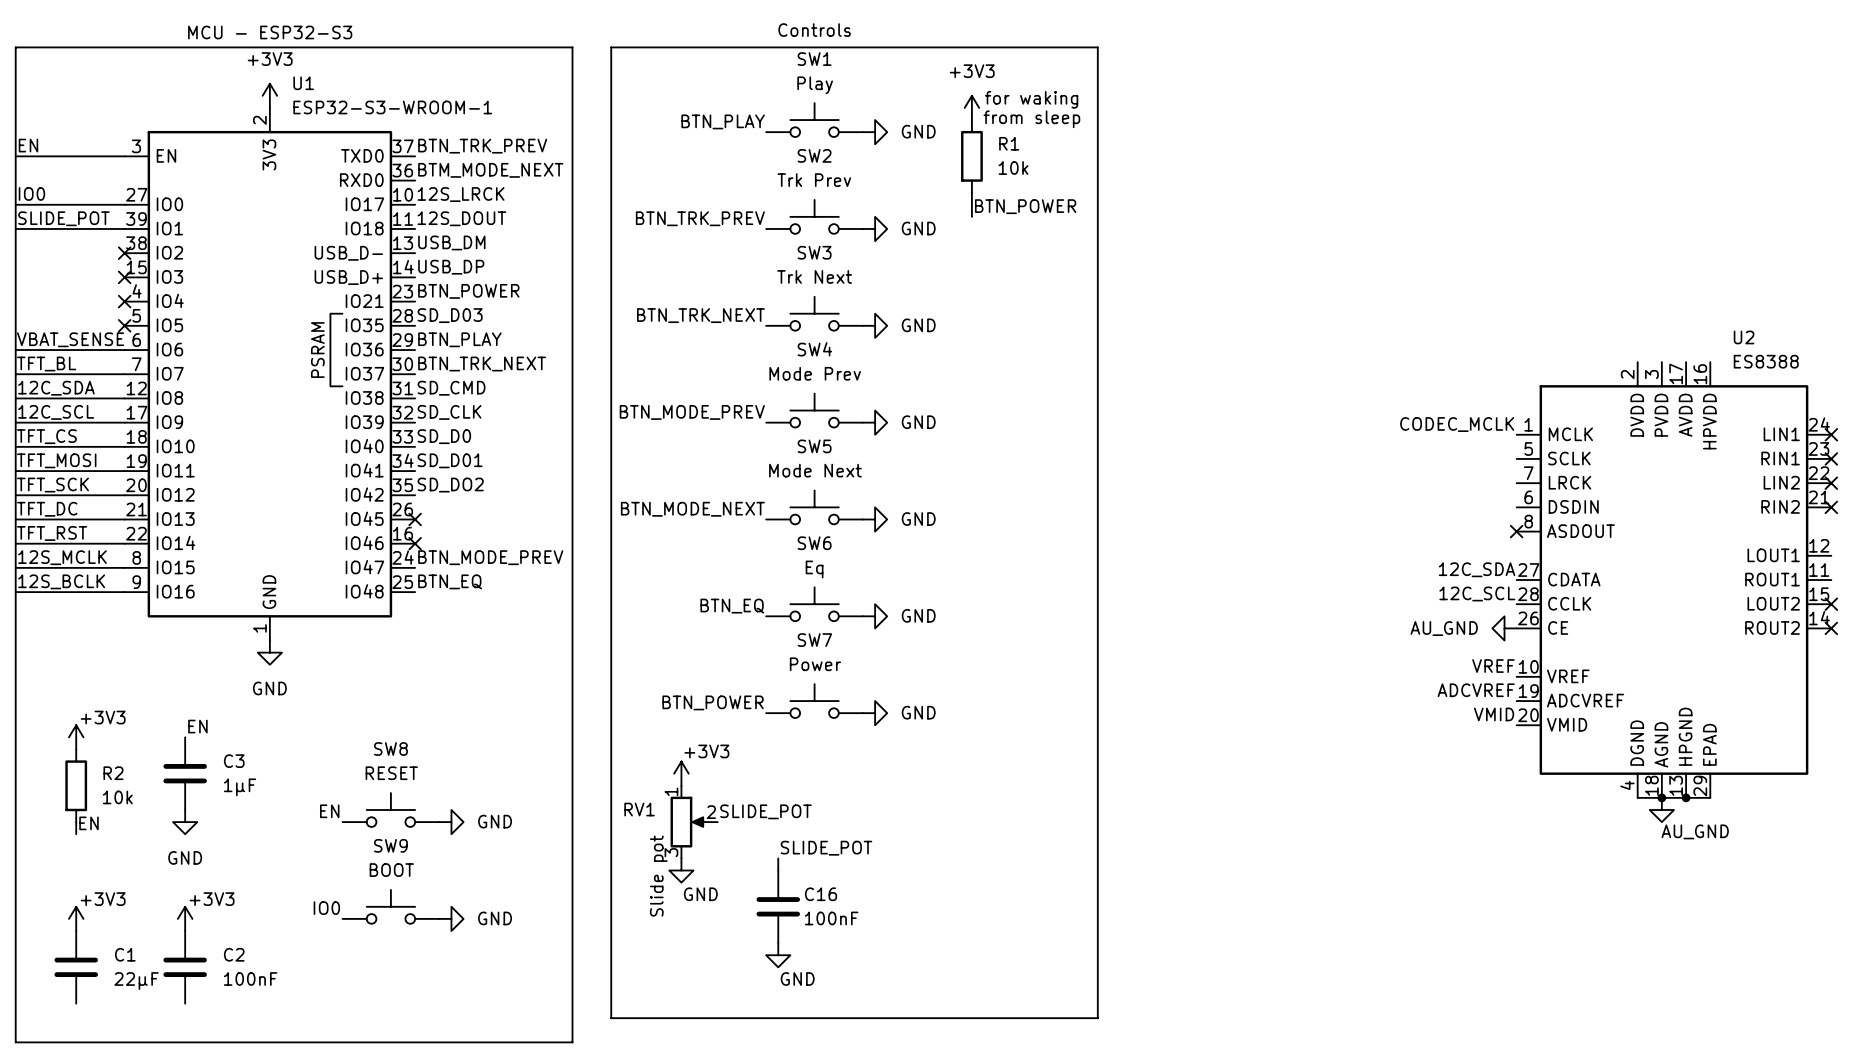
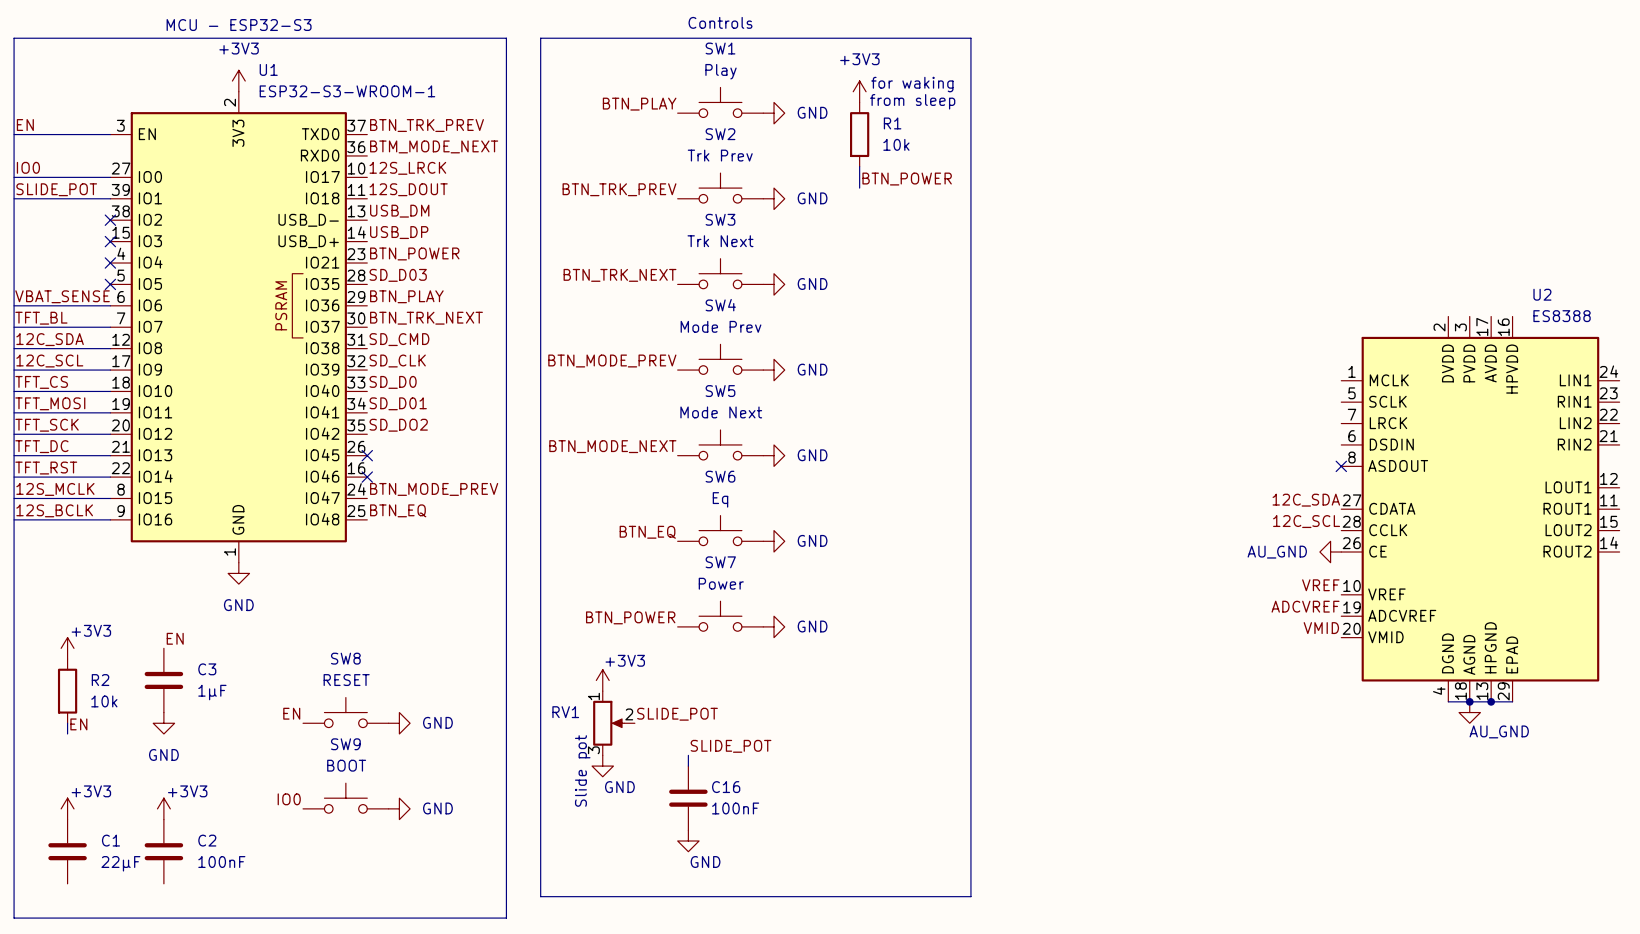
label: CODEC_MCLK (1457, 424) -> none
no-connect mark: (1831, 434) -> none
no-connect mark: (1831, 458) -> none
no-connect mark: (1831, 483) -> none
no-connect mark: (1831, 507) -> none
no-connect mark: (1831, 604) -> none
no-connect mark: (1831, 628) -> none

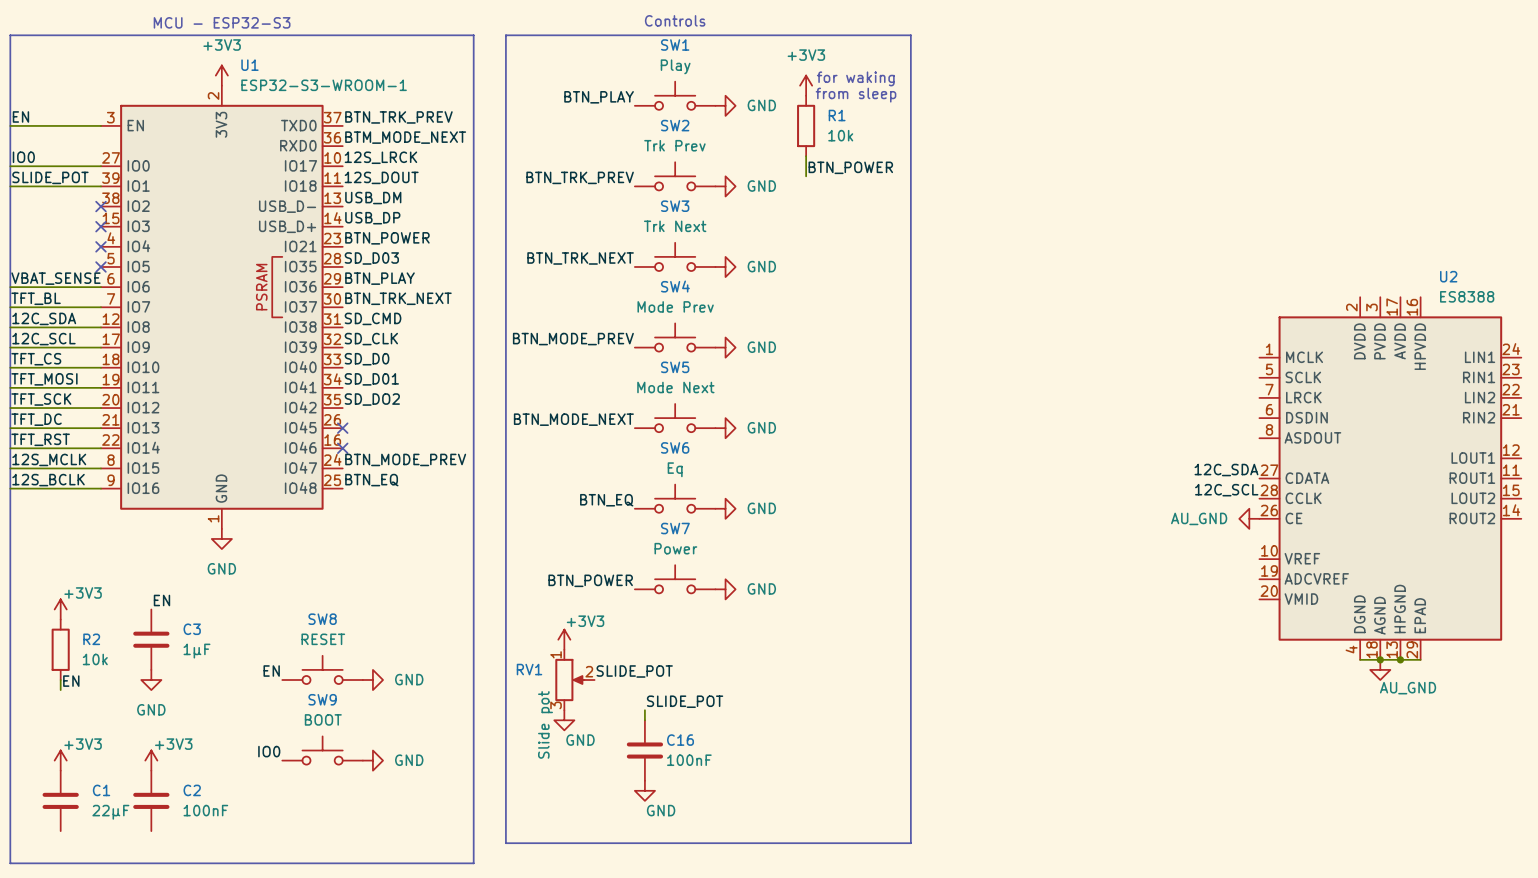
no-connect mark: (1341, 466) -> none
label: VREF (1320, 585) -> none
label: ADCVREF (1305, 606) -> none
label: VMID (1321, 628) -> none

